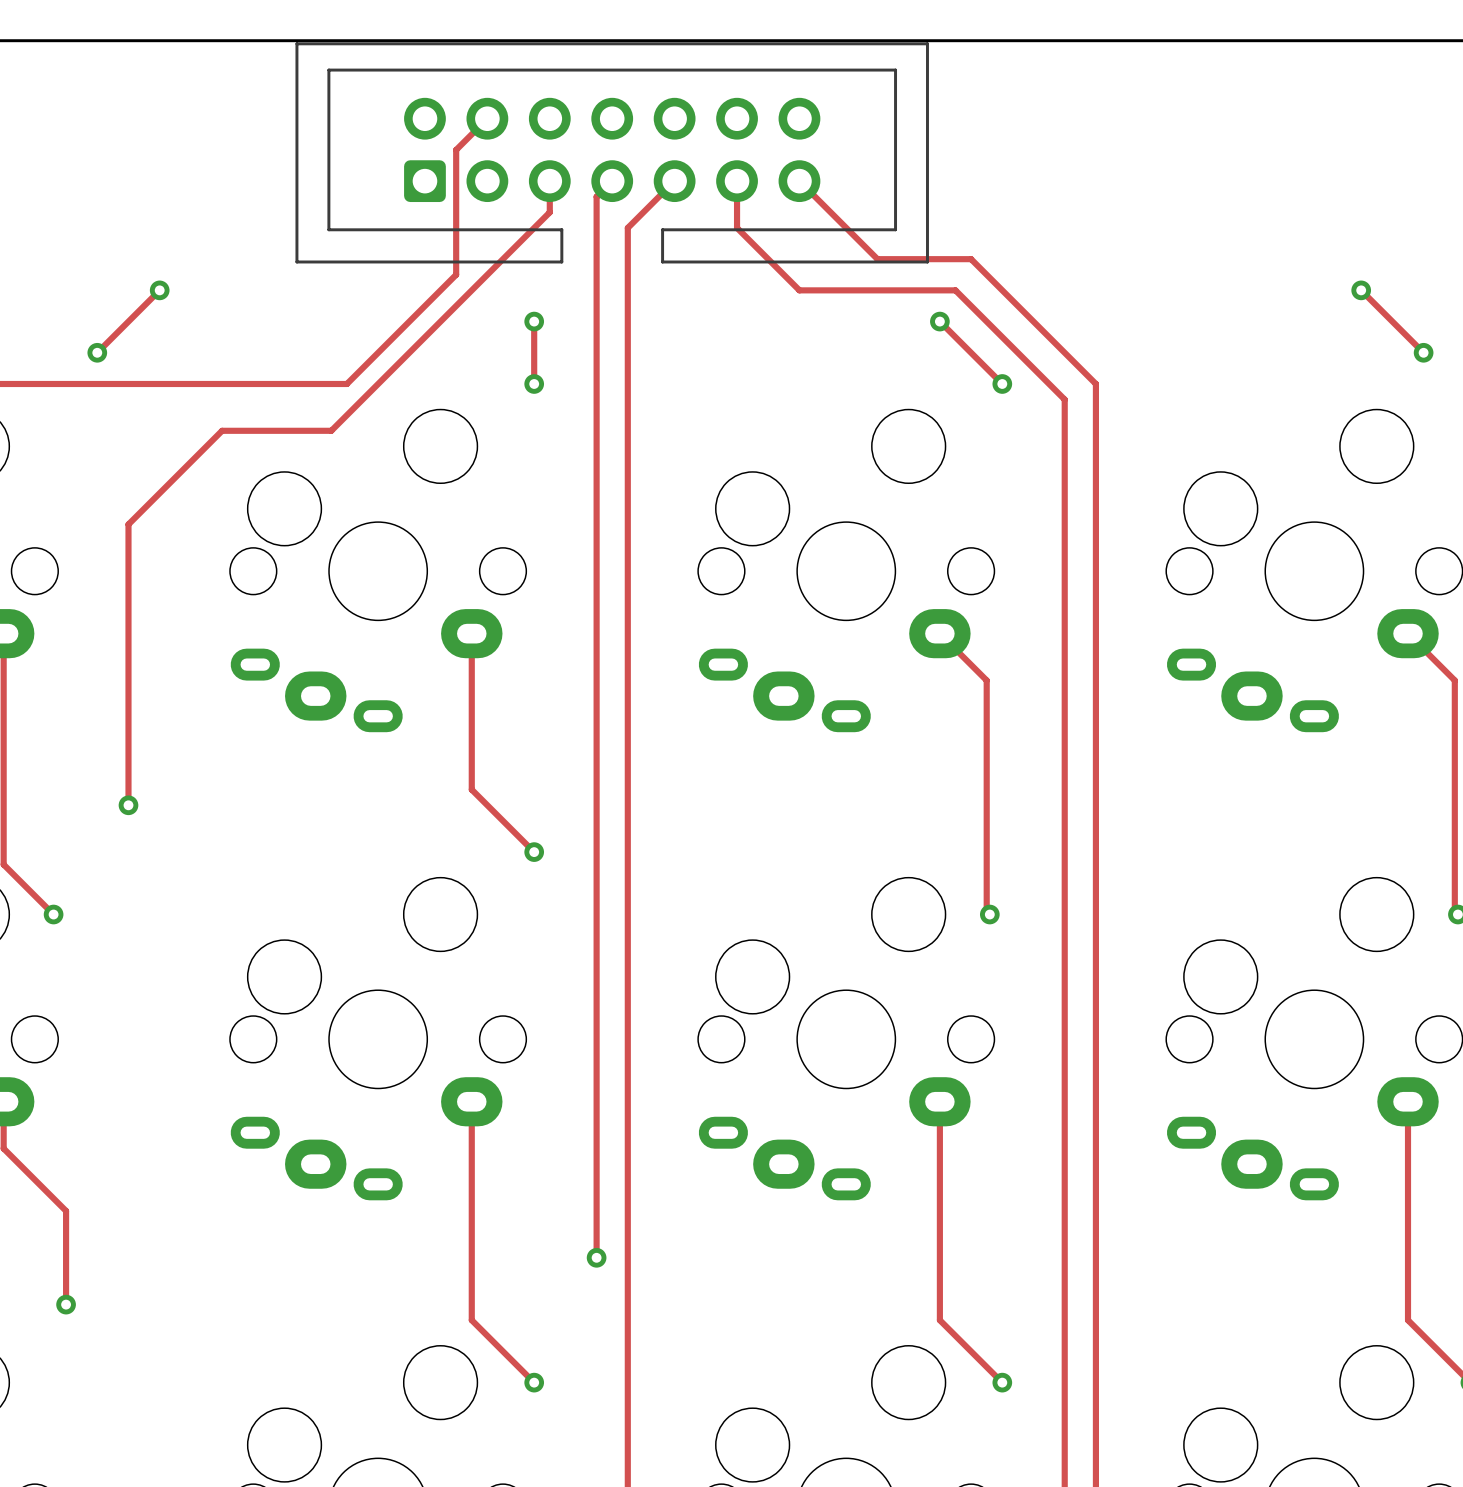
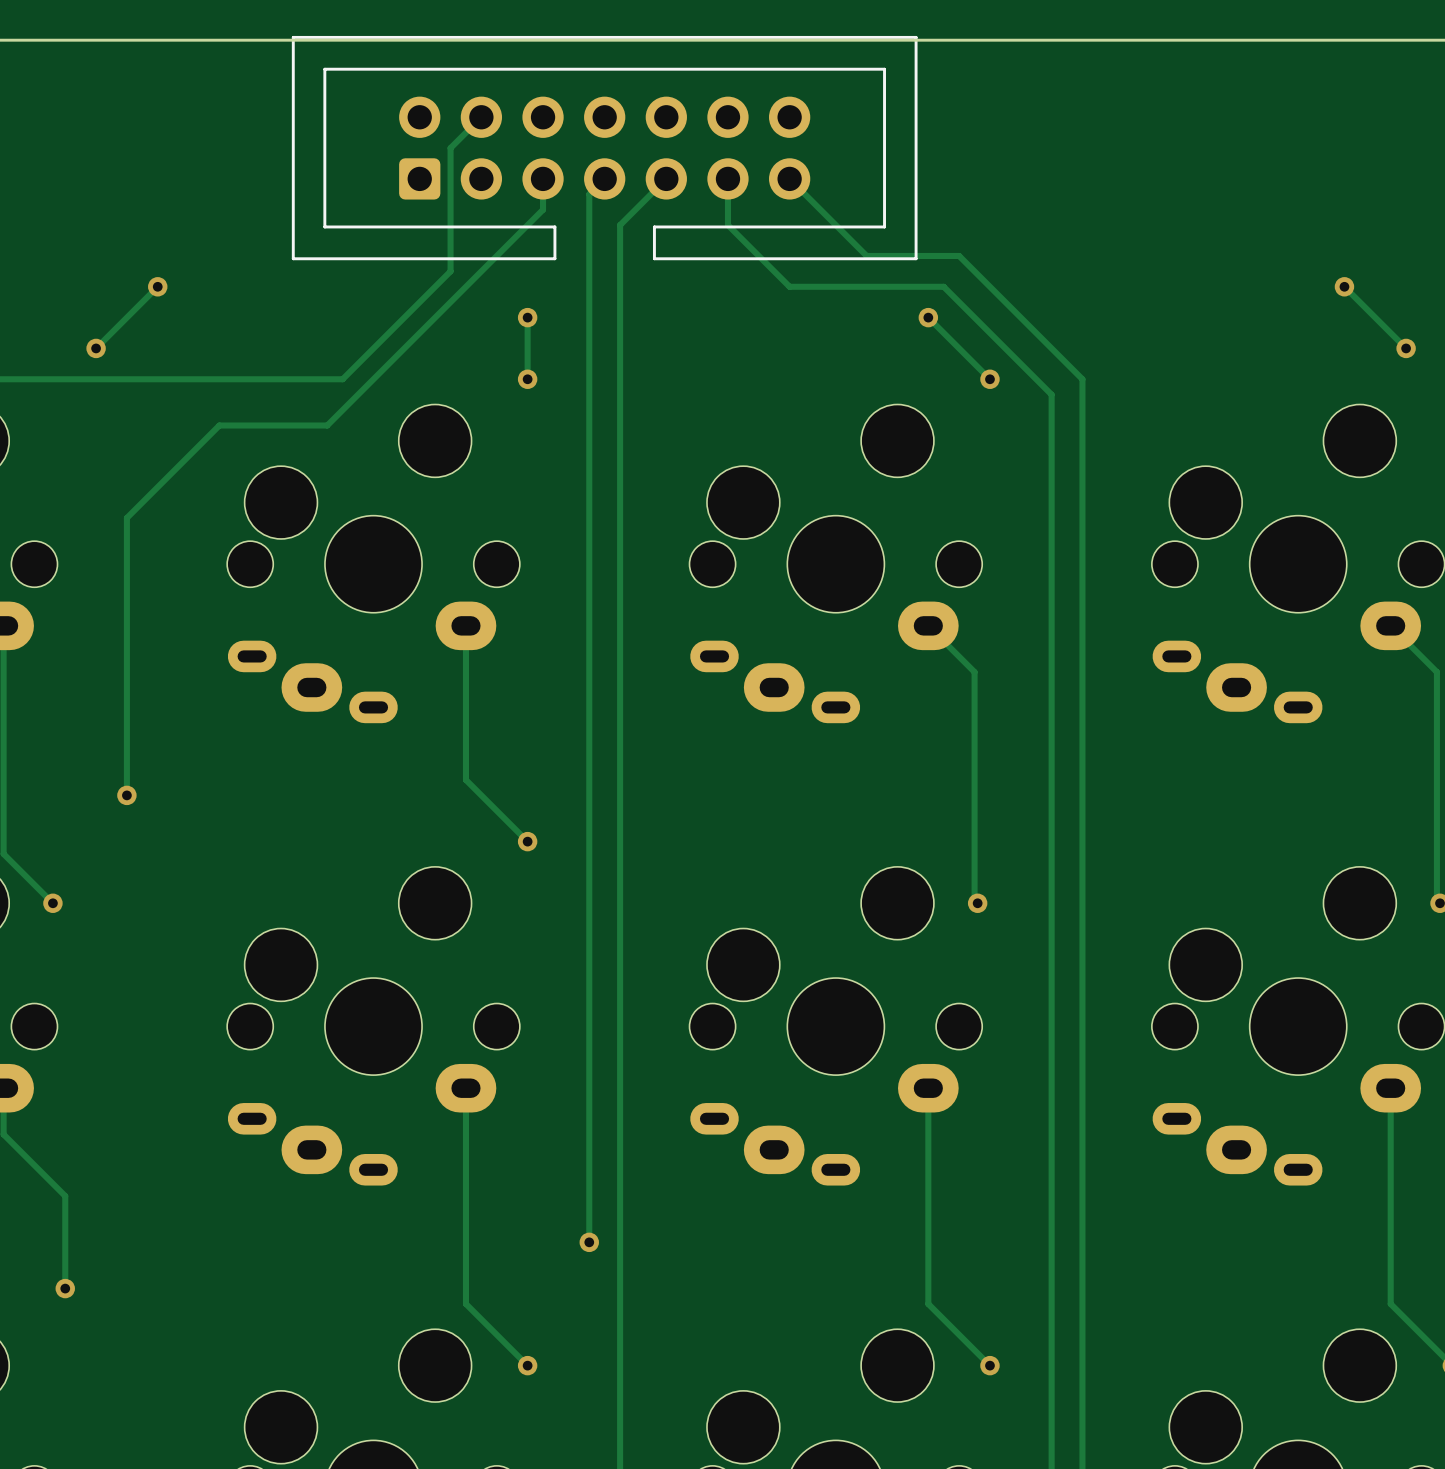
part footprint: [295, 42, 929, 264] -> [291, 35, 918, 261]

